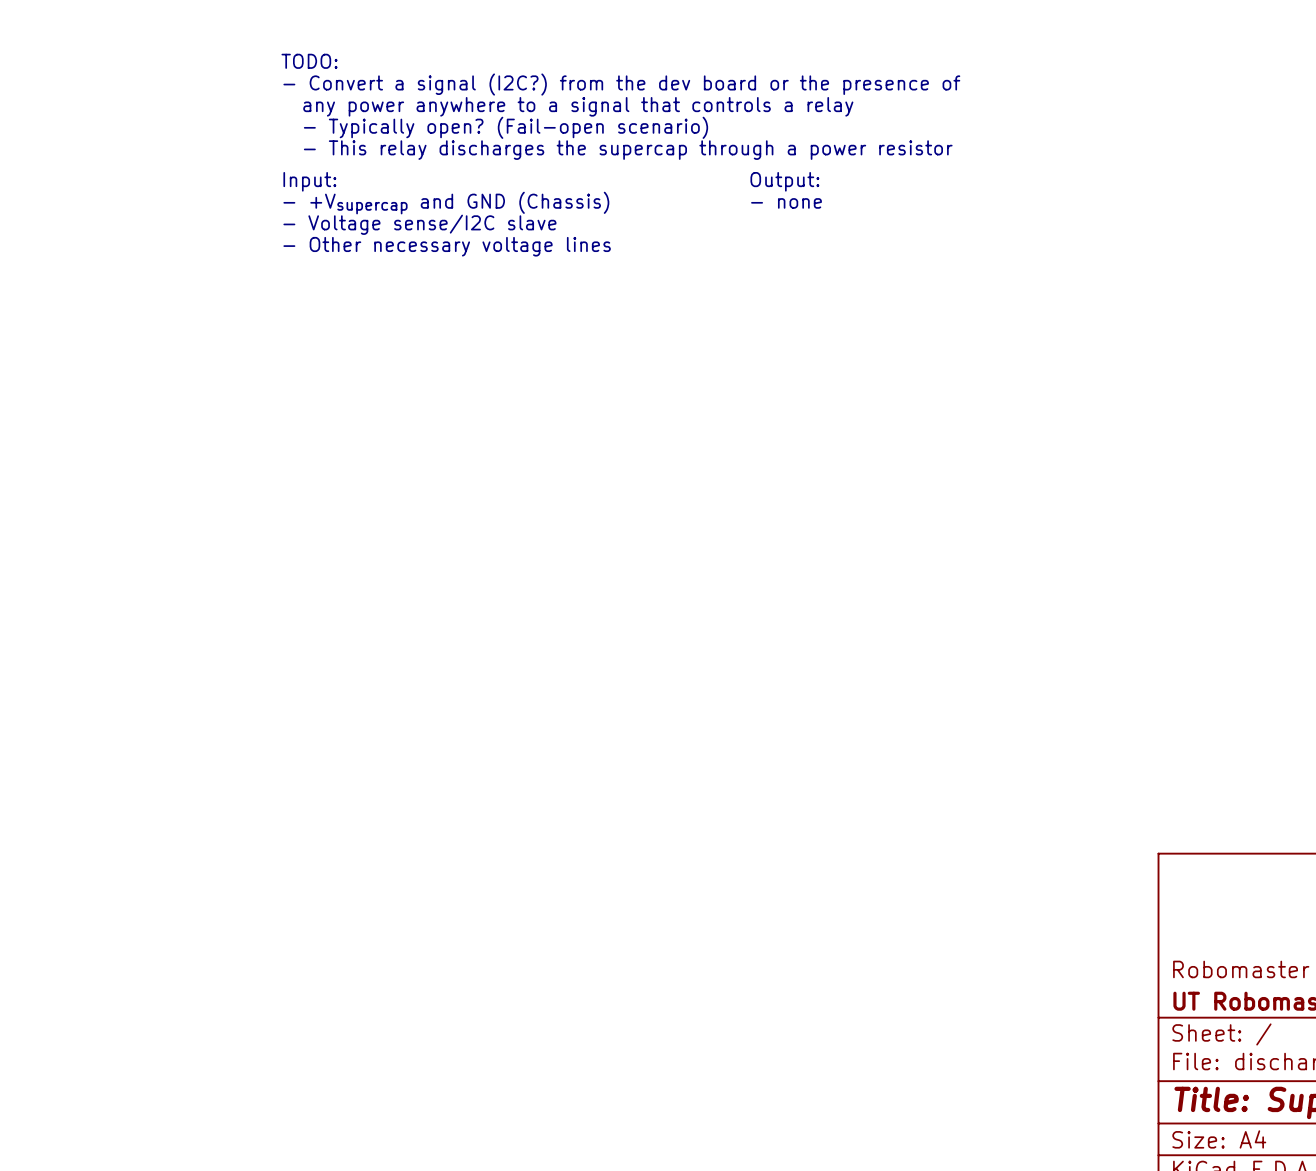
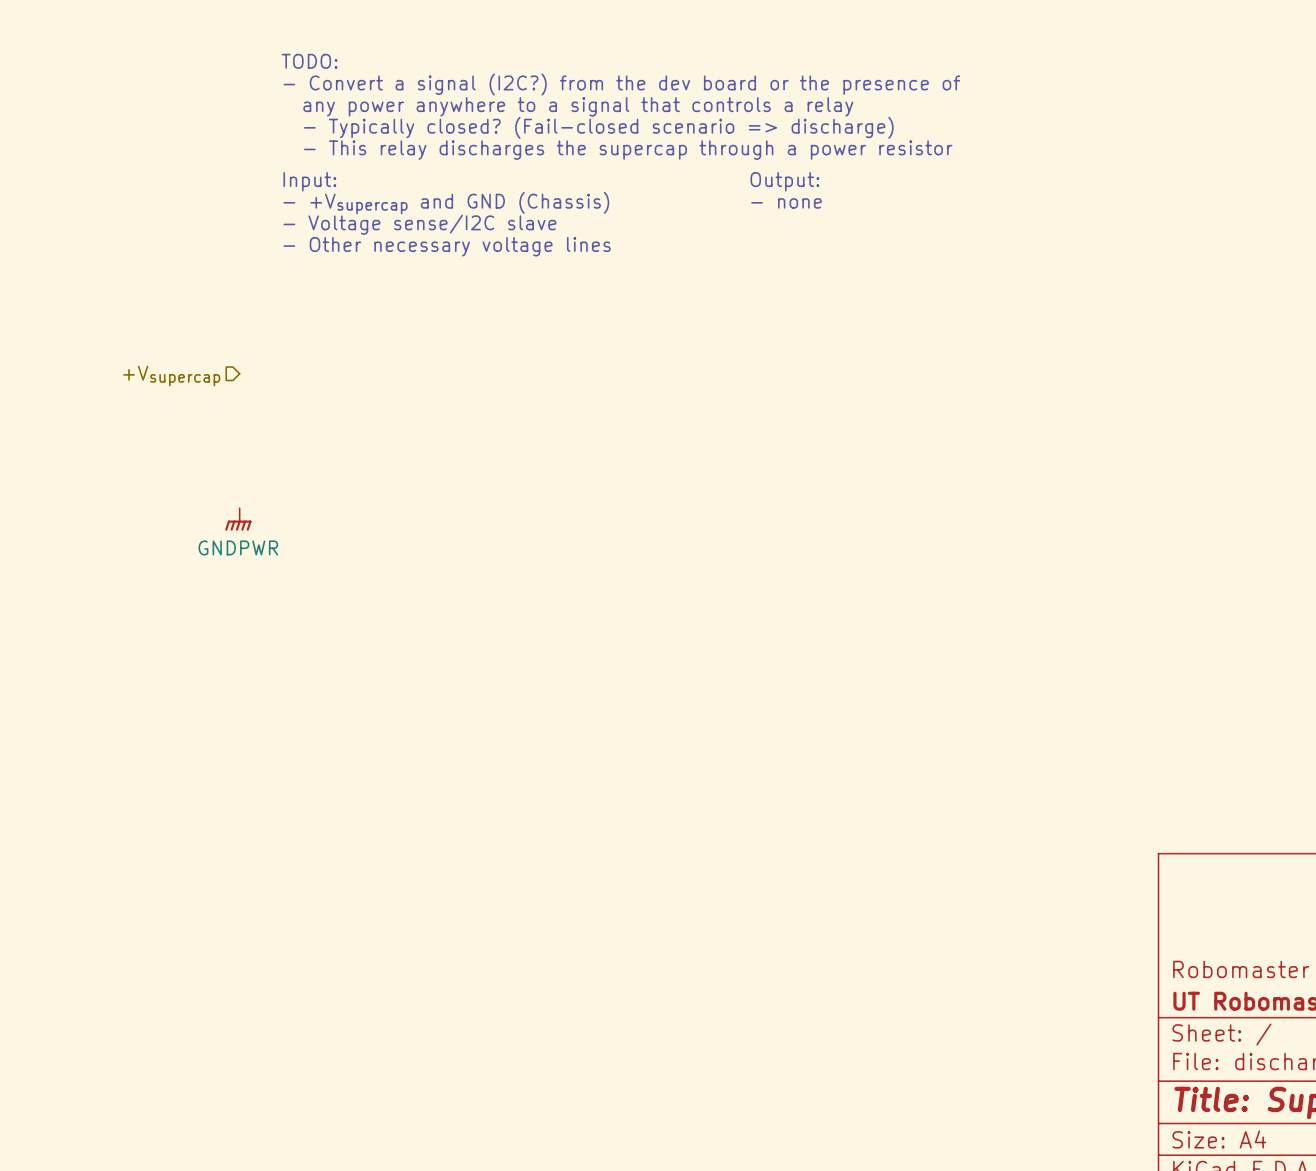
text: - Typically open? (Fail-open scenario) (506, 127) -> - Typically closed? (Fail-closed scenario => discharge) (598, 127)
hierarchical label: none -> +Vsupercap (171, 376)
power symbol: none -> GNDPWR (238, 519)

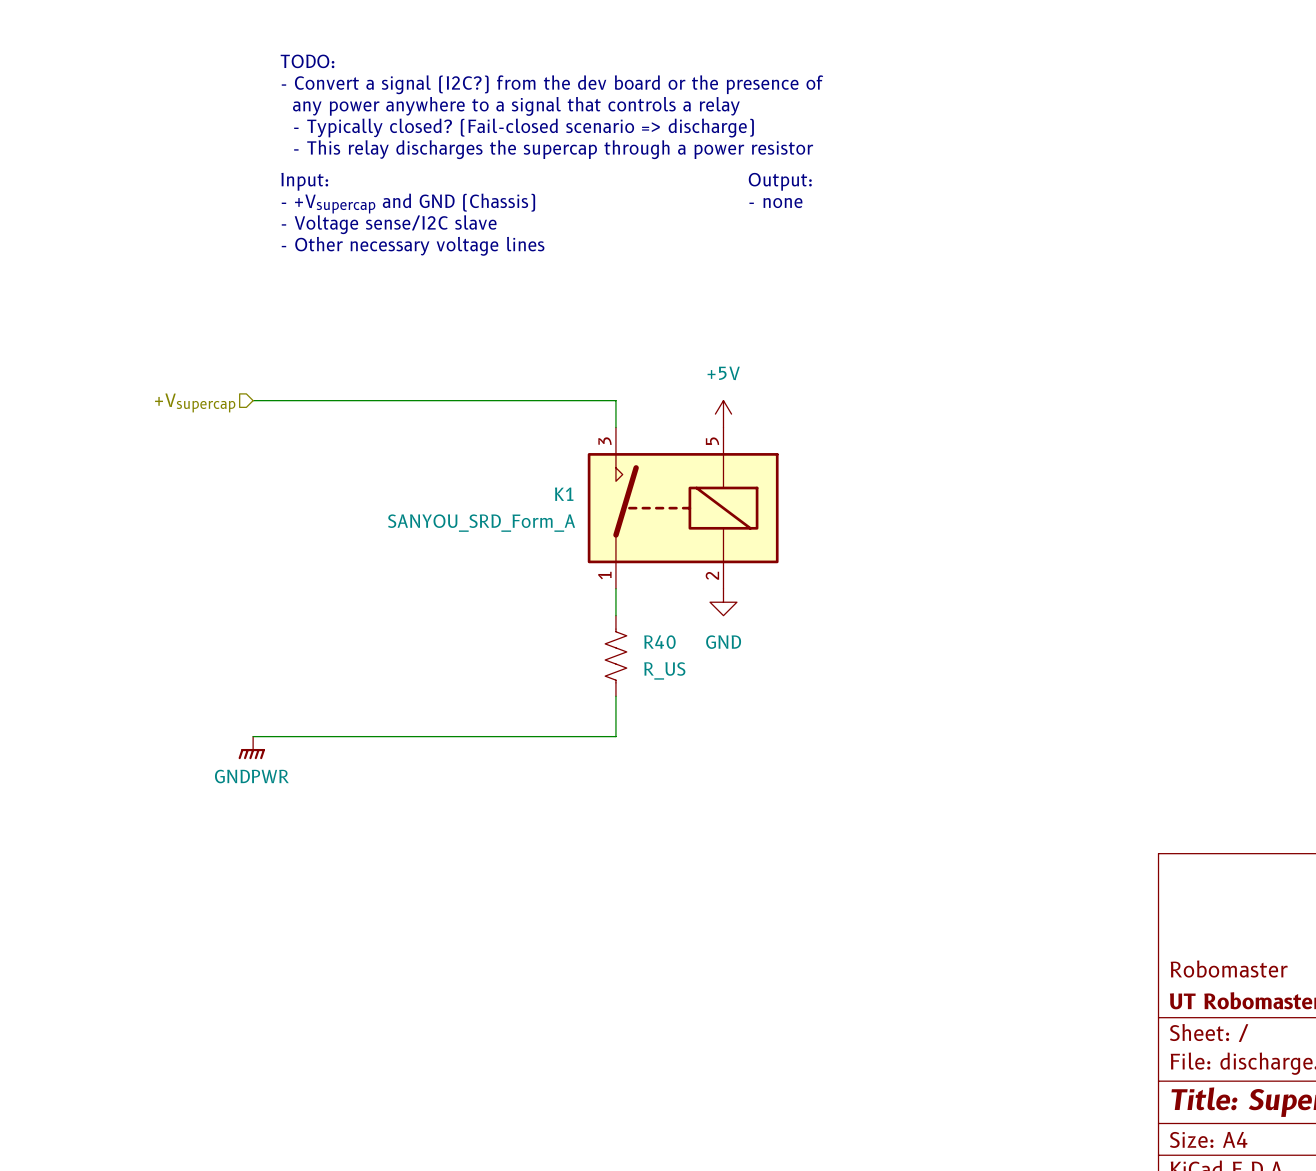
hierarchical label position: +Vsupercap (171, 376) -> +Vsupercap (195, 402)
wire: none -> (253, 400) (615, 400) (615, 427)
power symbol: none -> +5V (723, 414)
K1: none -> SANYOU_SRD_Form_A (683, 508)
power symbol position: GNDPWR (238, 519) -> GNDPWR (251, 747)
wire: none -> (615, 588) (615, 615)
power symbol: none -> GND (723, 602)
R40: none -> R_US (615, 655)
wire: none -> (615, 696) (615, 736) (253, 736)

